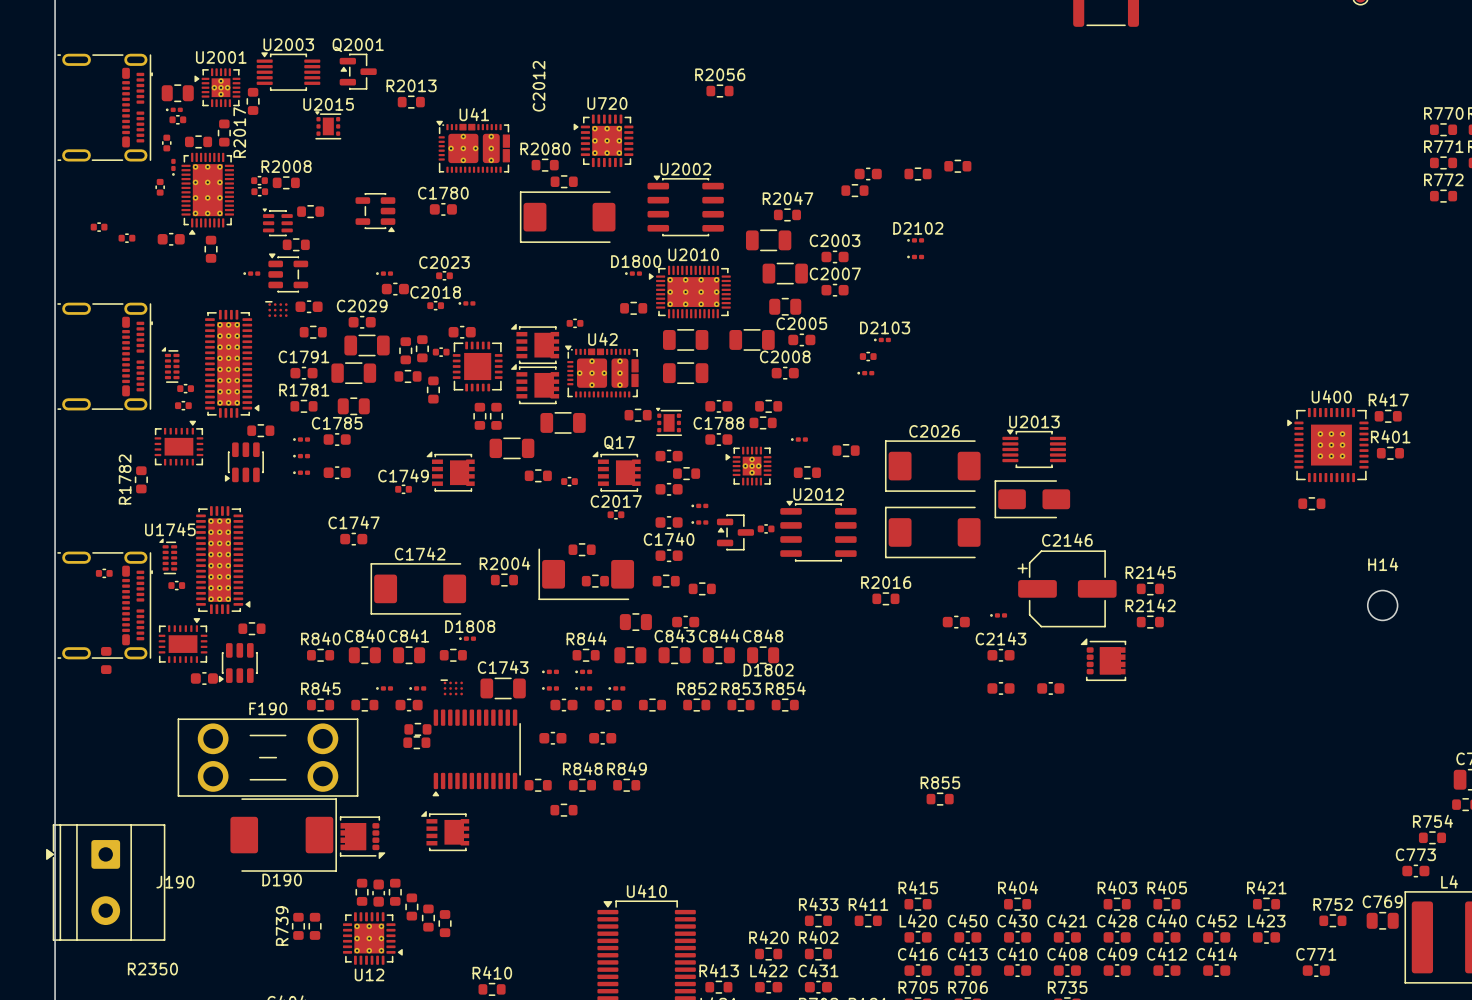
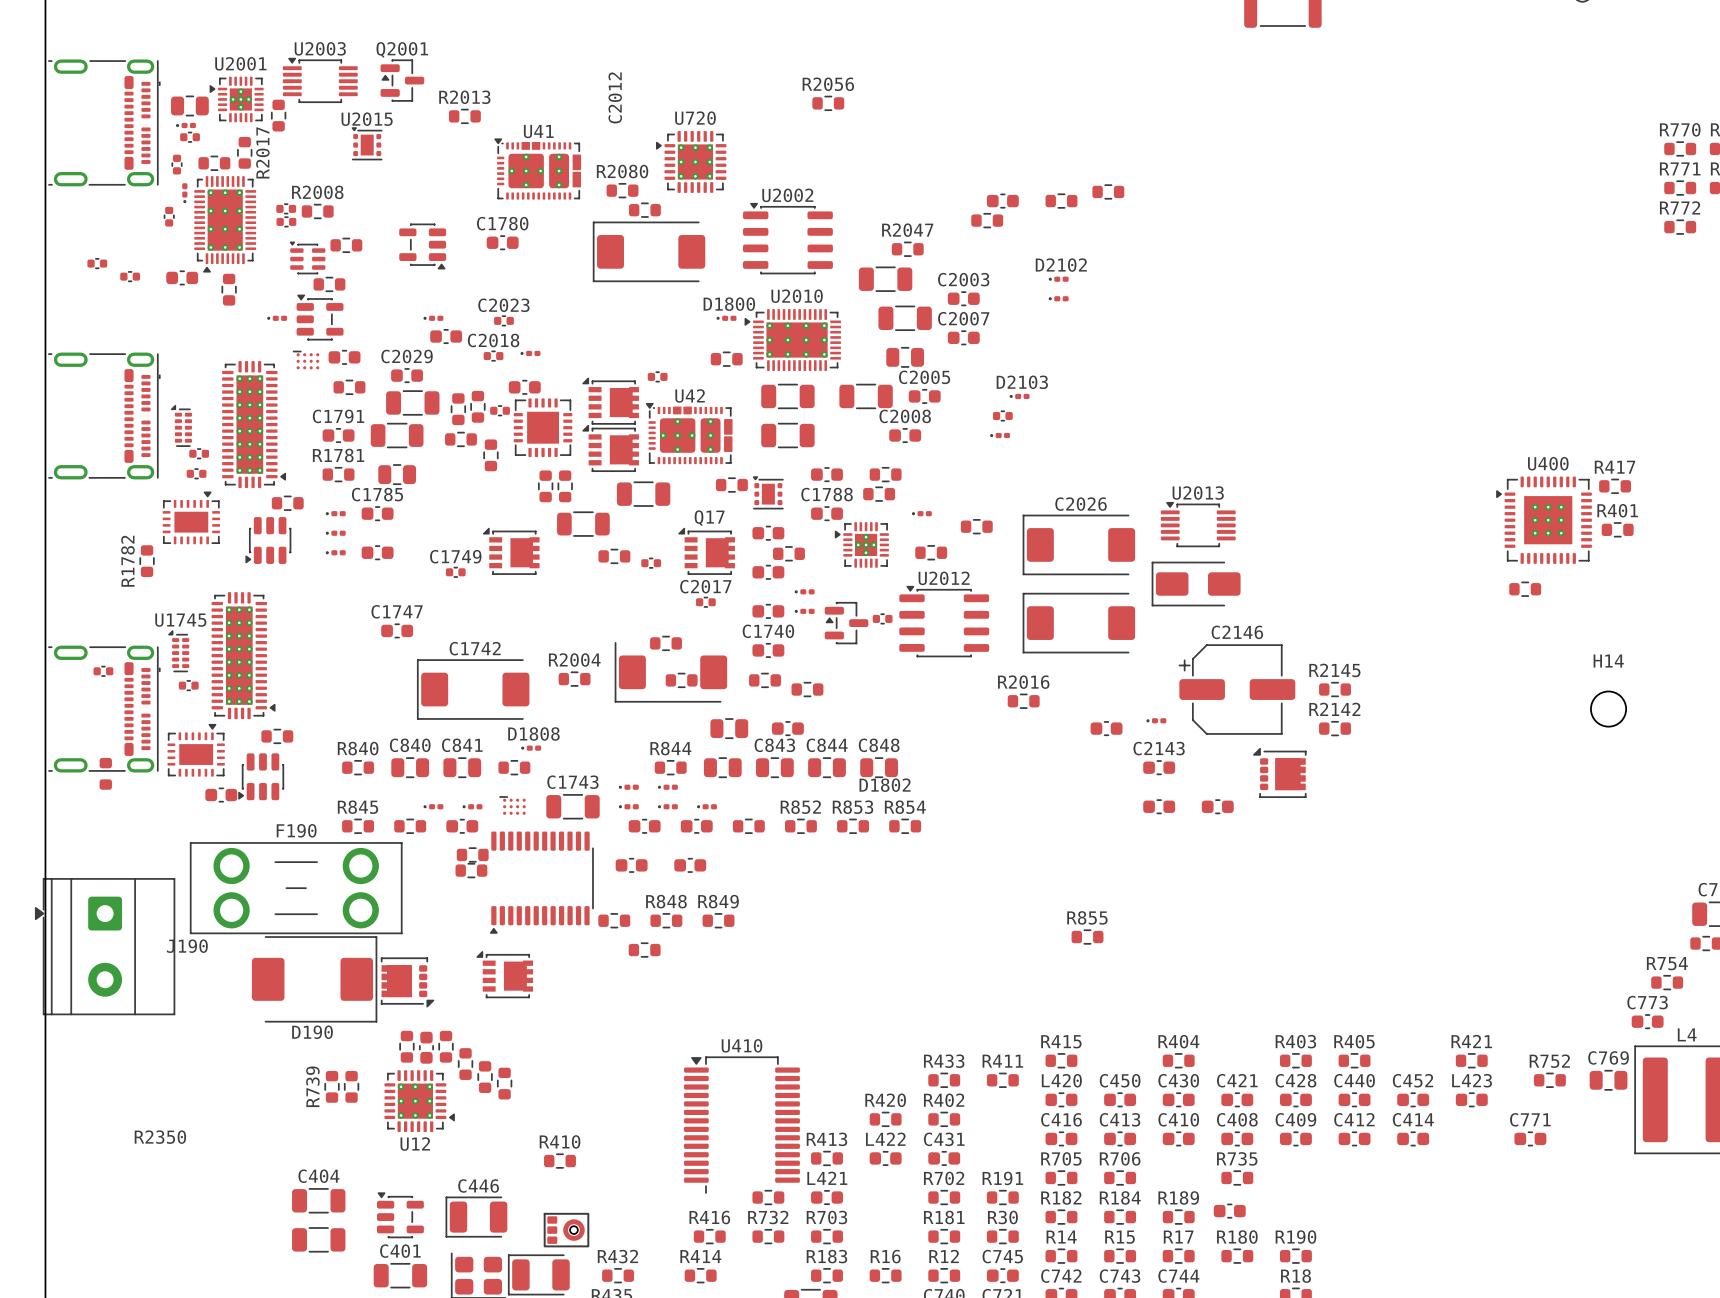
J190 position: (105, 882) -> (105, 946)

